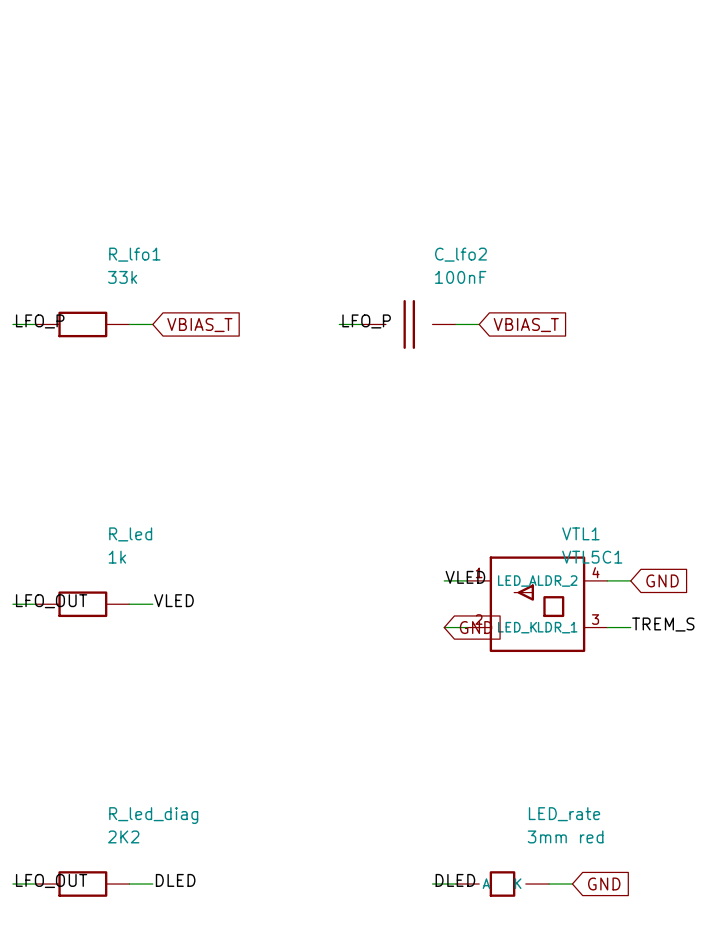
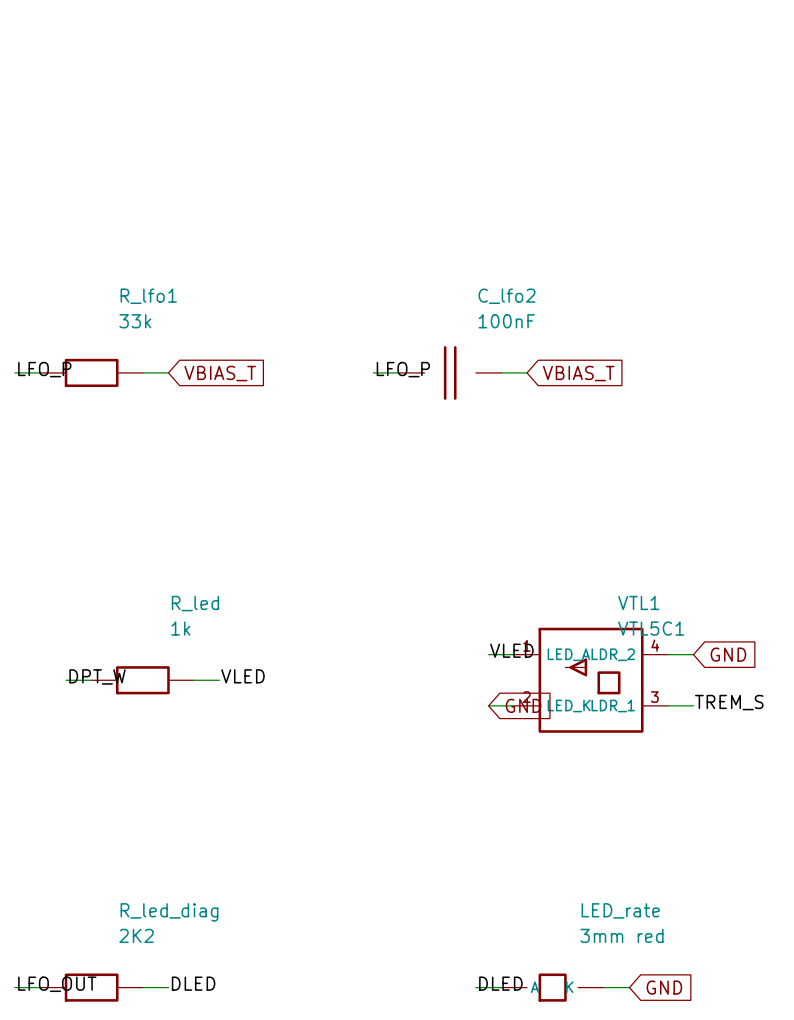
label position: VLED (173, 600) -> VLED (242, 676)
label: LFO_OUT (51, 601) -> none
label: none -> DPT_W (97, 676)
wire: (12, 604) (36, 604) -> (66, 680) (91, 680)
R_led position: (82, 604) -> (142, 680)
wire: (129, 604) (152, 604) -> (194, 680) (219, 680)

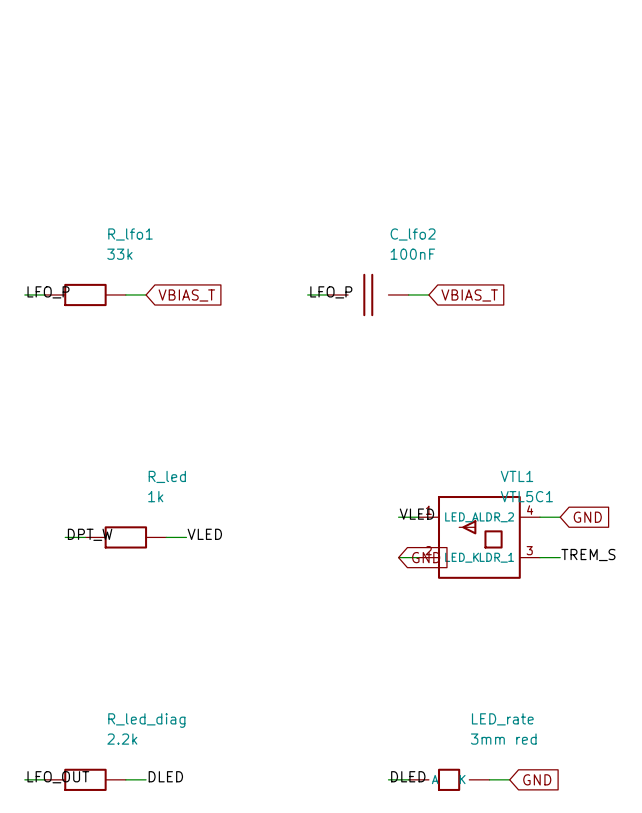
R_led_diag value: 2K2 (136, 935) -> 2.2k (122, 739)

